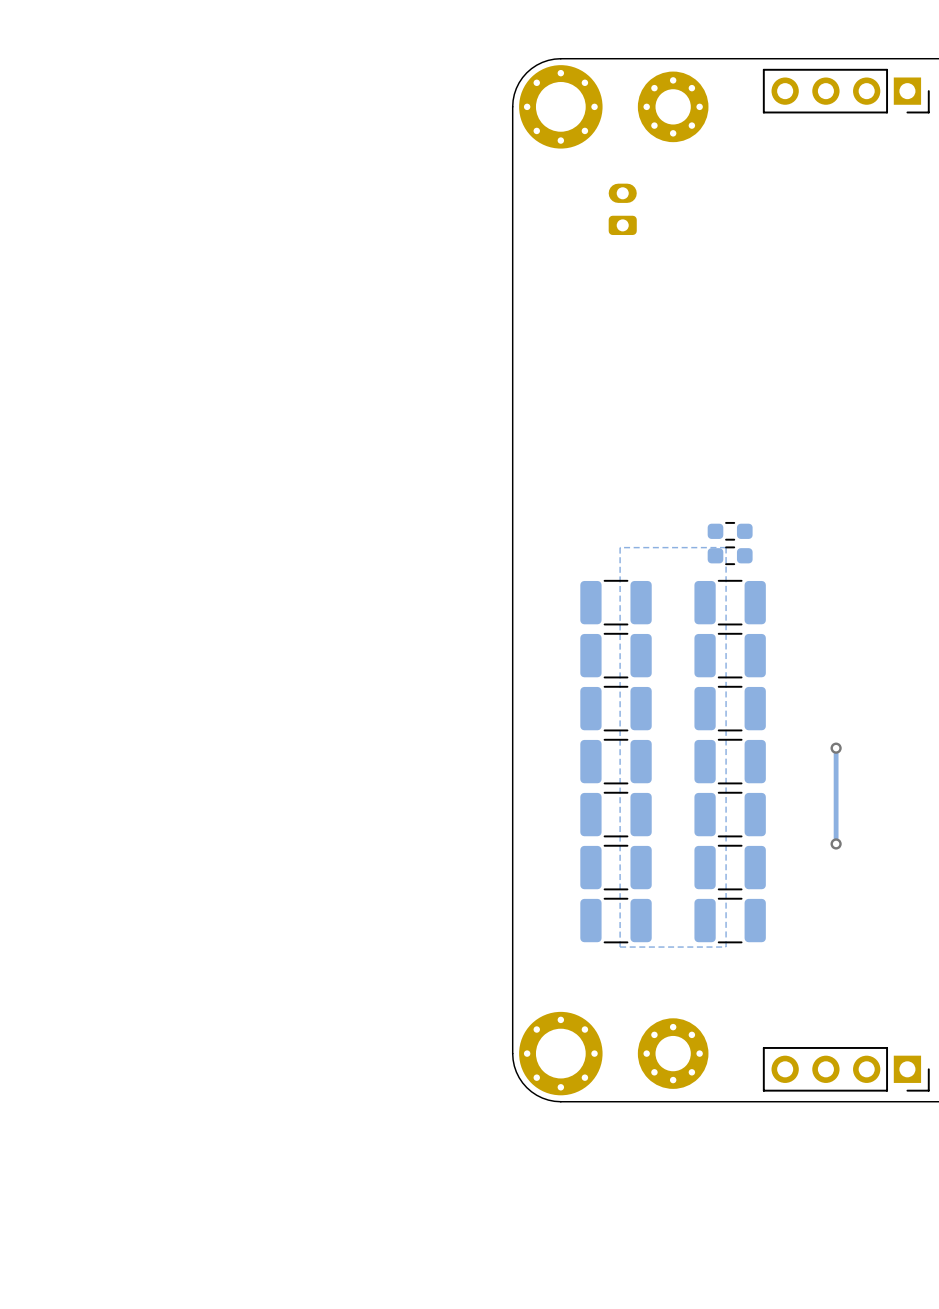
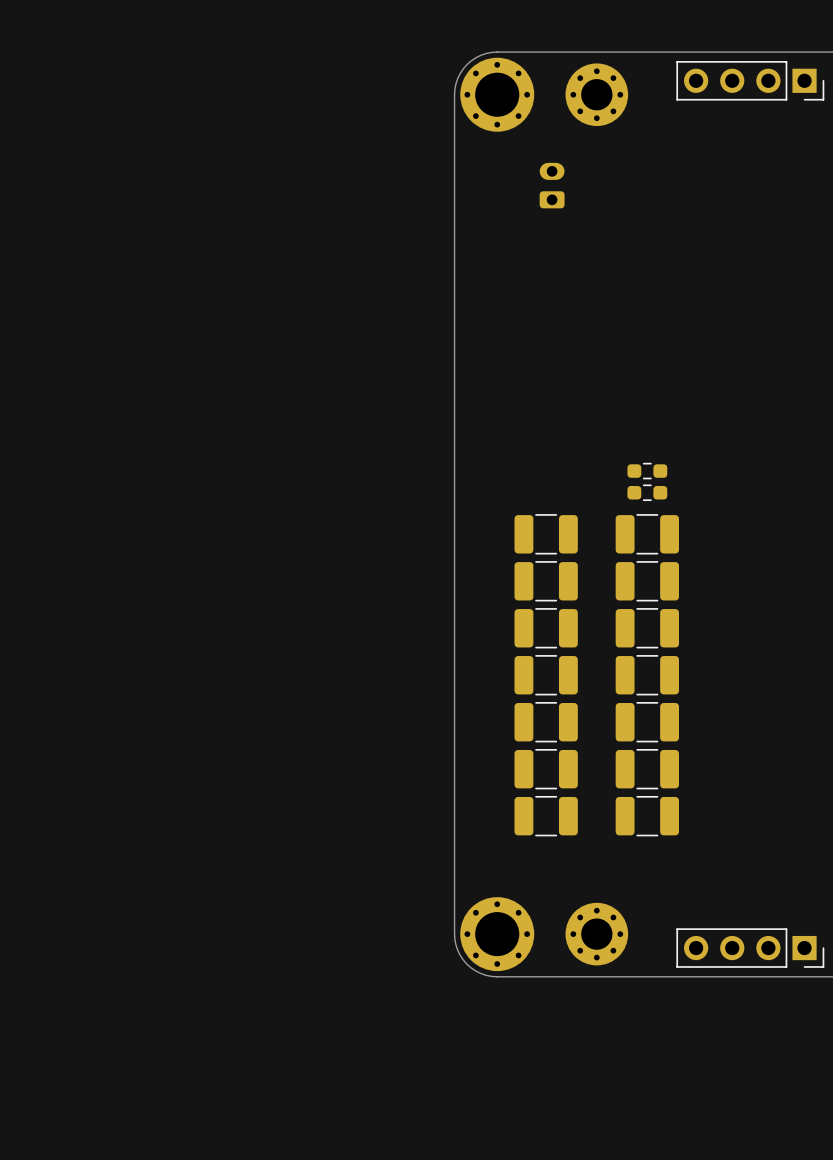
zone outline: (726, 547) (726, 947) (620, 947) (620, 547) (726, 547) -> none
track: (836, 748) (836, 843) -> none
via: (836, 748) -> none
via: (836, 843) -> none

